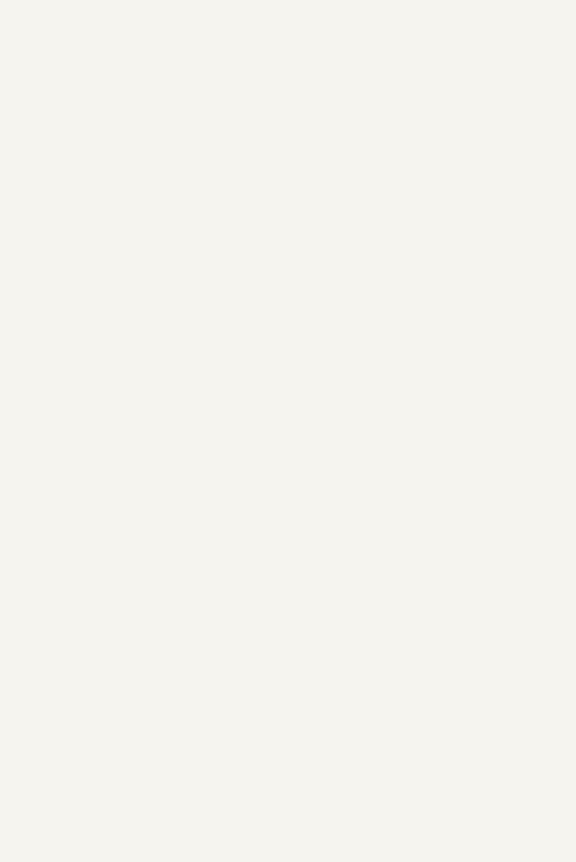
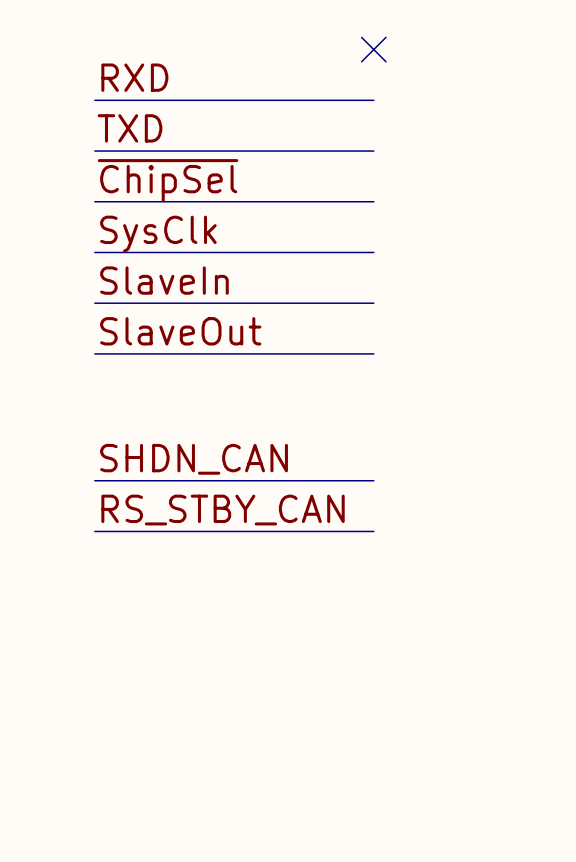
no-connect mark: none -> (373, 49)
label: none -> RXD (134, 77)
wire: none -> (94, 100) (373, 100)
label: none -> TXD (130, 128)
wire: none -> (94, 151) (373, 151)
label: none -> ~{ChipSel} (168, 180)
wire: none -> (94, 201) (373, 201)
label: none -> SysClk (158, 234)
wire: none -> (94, 252) (373, 252)
label: none -> SlaveIn (164, 280)
wire: none -> (94, 303) (373, 303)
label: none -> SlaveOut (180, 331)
wire: none -> (94, 353) (373, 353)
label: none -> SHDN_CAN (194, 459)
wire: none -> (94, 480) (373, 480)
label: none -> RS_STBY_CAN (223, 510)
wire: none -> (94, 531) (373, 531)

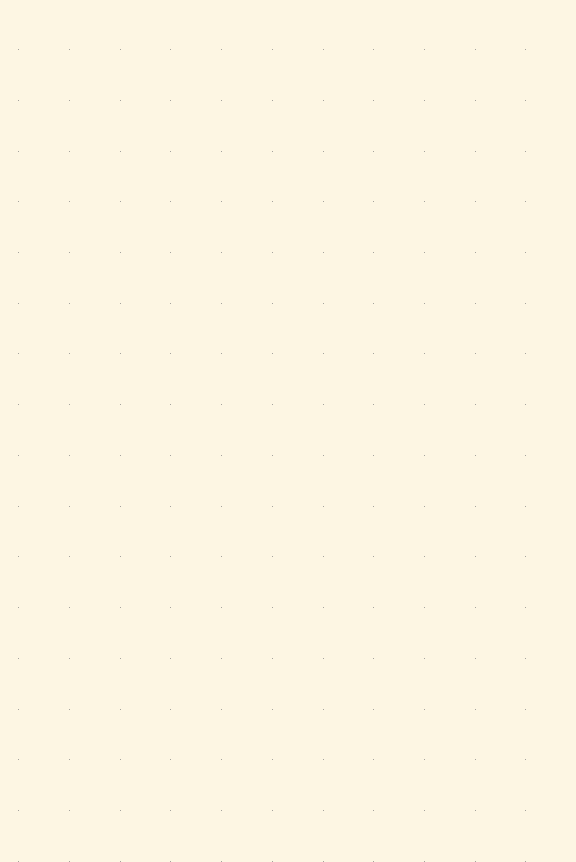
no-connect mark: (373, 49) -> none
label: RXD (134, 77) -> none
wire: (94, 100) (373, 100) -> none
label: TXD (130, 128) -> none
wire: (94, 151) (373, 151) -> none
label: ~{ChipSel} (168, 180) -> none
wire: (94, 201) (373, 201) -> none
label: SysClk (158, 234) -> none
wire: (94, 252) (373, 252) -> none
label: SlaveIn (164, 280) -> none
wire: (94, 303) (373, 303) -> none
label: SlaveOut (180, 331) -> none
wire: (94, 353) (373, 353) -> none
label: SHDN_CAN (194, 459) -> none
wire: (94, 480) (373, 480) -> none
label: RS_STBY_CAN (223, 510) -> none
wire: (94, 531) (373, 531) -> none

